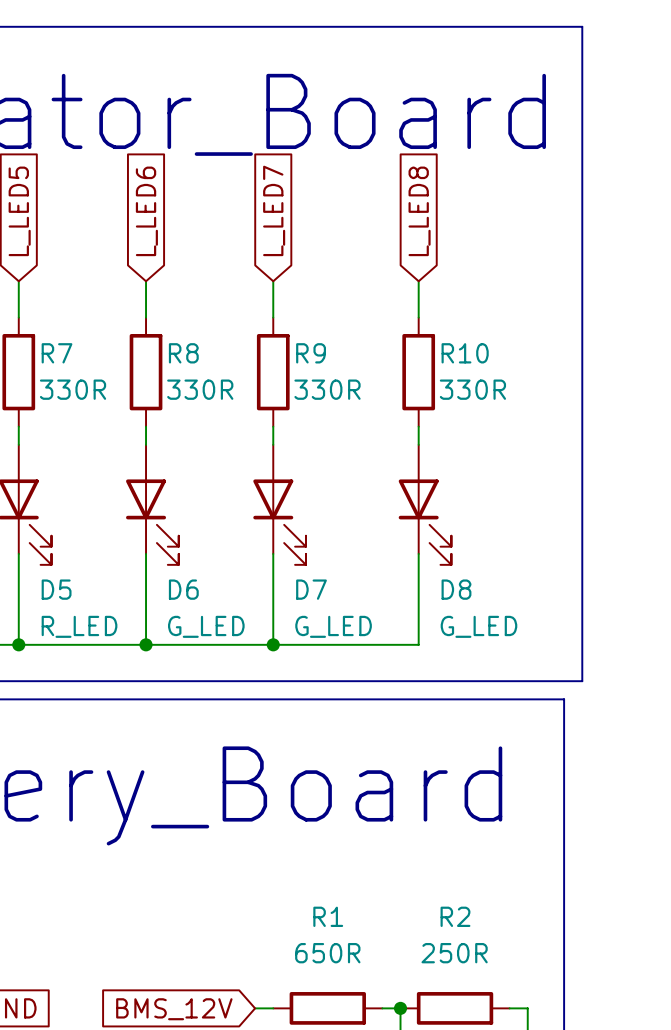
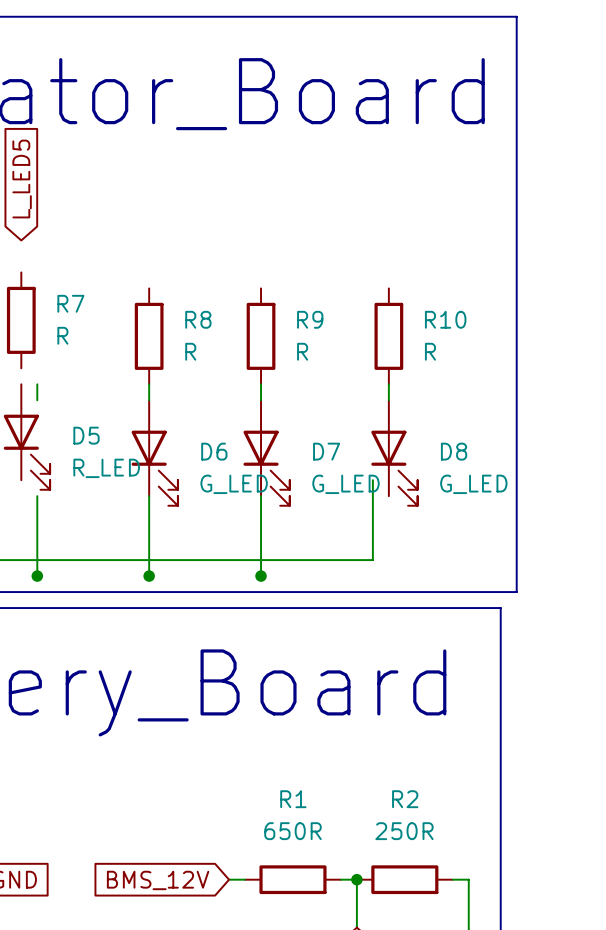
global label: L_LED7 (274, 210) -> none
global label: L_LED6 (146, 211) -> none
global label: L_LED8 (419, 211) -> none
wire: (18, 281) (18, 317) -> none
wire: (146, 281) (146, 317) -> none
wire: (273, 281) (273, 317) -> none
wire: (418, 281) (418, 317) -> none
R7 name position: R7 (57, 353) -> R7 (70, 303)
R8 name position: R8 (183, 353) -> R8 (198, 319)
R9 name position: R9 (311, 353) -> R9 (310, 319)
R10 name position: R10 (465, 353) -> R10 (445, 319)
R8 position: (146, 372) -> (149, 336)
R9 position: (273, 372) -> (261, 336)
R10 position: (418, 372) -> (388, 336)
R7 value: 330R (73, 389) -> R (62, 335)
R8 value: 330R (200, 389) -> R (190, 351)
R9 value: 330R (327, 389) -> R (302, 351)
R10 value: 330R (472, 389) -> R (430, 351)
wire: (18, 426) (18, 444) -> (37, 384) (37, 400)
wire: (146, 426) (146, 444) -> (149, 384) (149, 400)
wire: (273, 426) (273, 444) -> (261, 384) (261, 400)
wire: (418, 426) (418, 444) -> (388, 384) (388, 400)
D6 position: (152, 504) -> (154, 453)
D7 position: (279, 504) -> (266, 453)
D8 position: (425, 504) -> (394, 453)
wire: (18, 553) (18, 644) -> (37, 496) (37, 576)
wire: (146, 553) (146, 644) -> (149, 496) (149, 576)
wire: (273, 553) (273, 644) -> (261, 496) (261, 576)
D5 name position: D5 (56, 589) -> D5 (86, 435)
D6 name position: D6 (183, 589) -> D6 (214, 451)
D7 name position: D7 (311, 589) -> D7 (326, 451)
D8 name position: D8 (456, 589) -> D8 (454, 451)
D5 value position: R_LED (79, 626) -> R_LED (106, 468)
D6 value position: G_LED (206, 626) -> G_LED (234, 484)
D7 value position: G_LED (333, 626) -> G_LED (345, 484)
D8 value position: G_LED (478, 626) -> G_LED (473, 484)
junction position: (18, 644) -> (37, 576)
junction position: (146, 644) -> (149, 576)
junction position: (273, 644) -> (261, 576)

